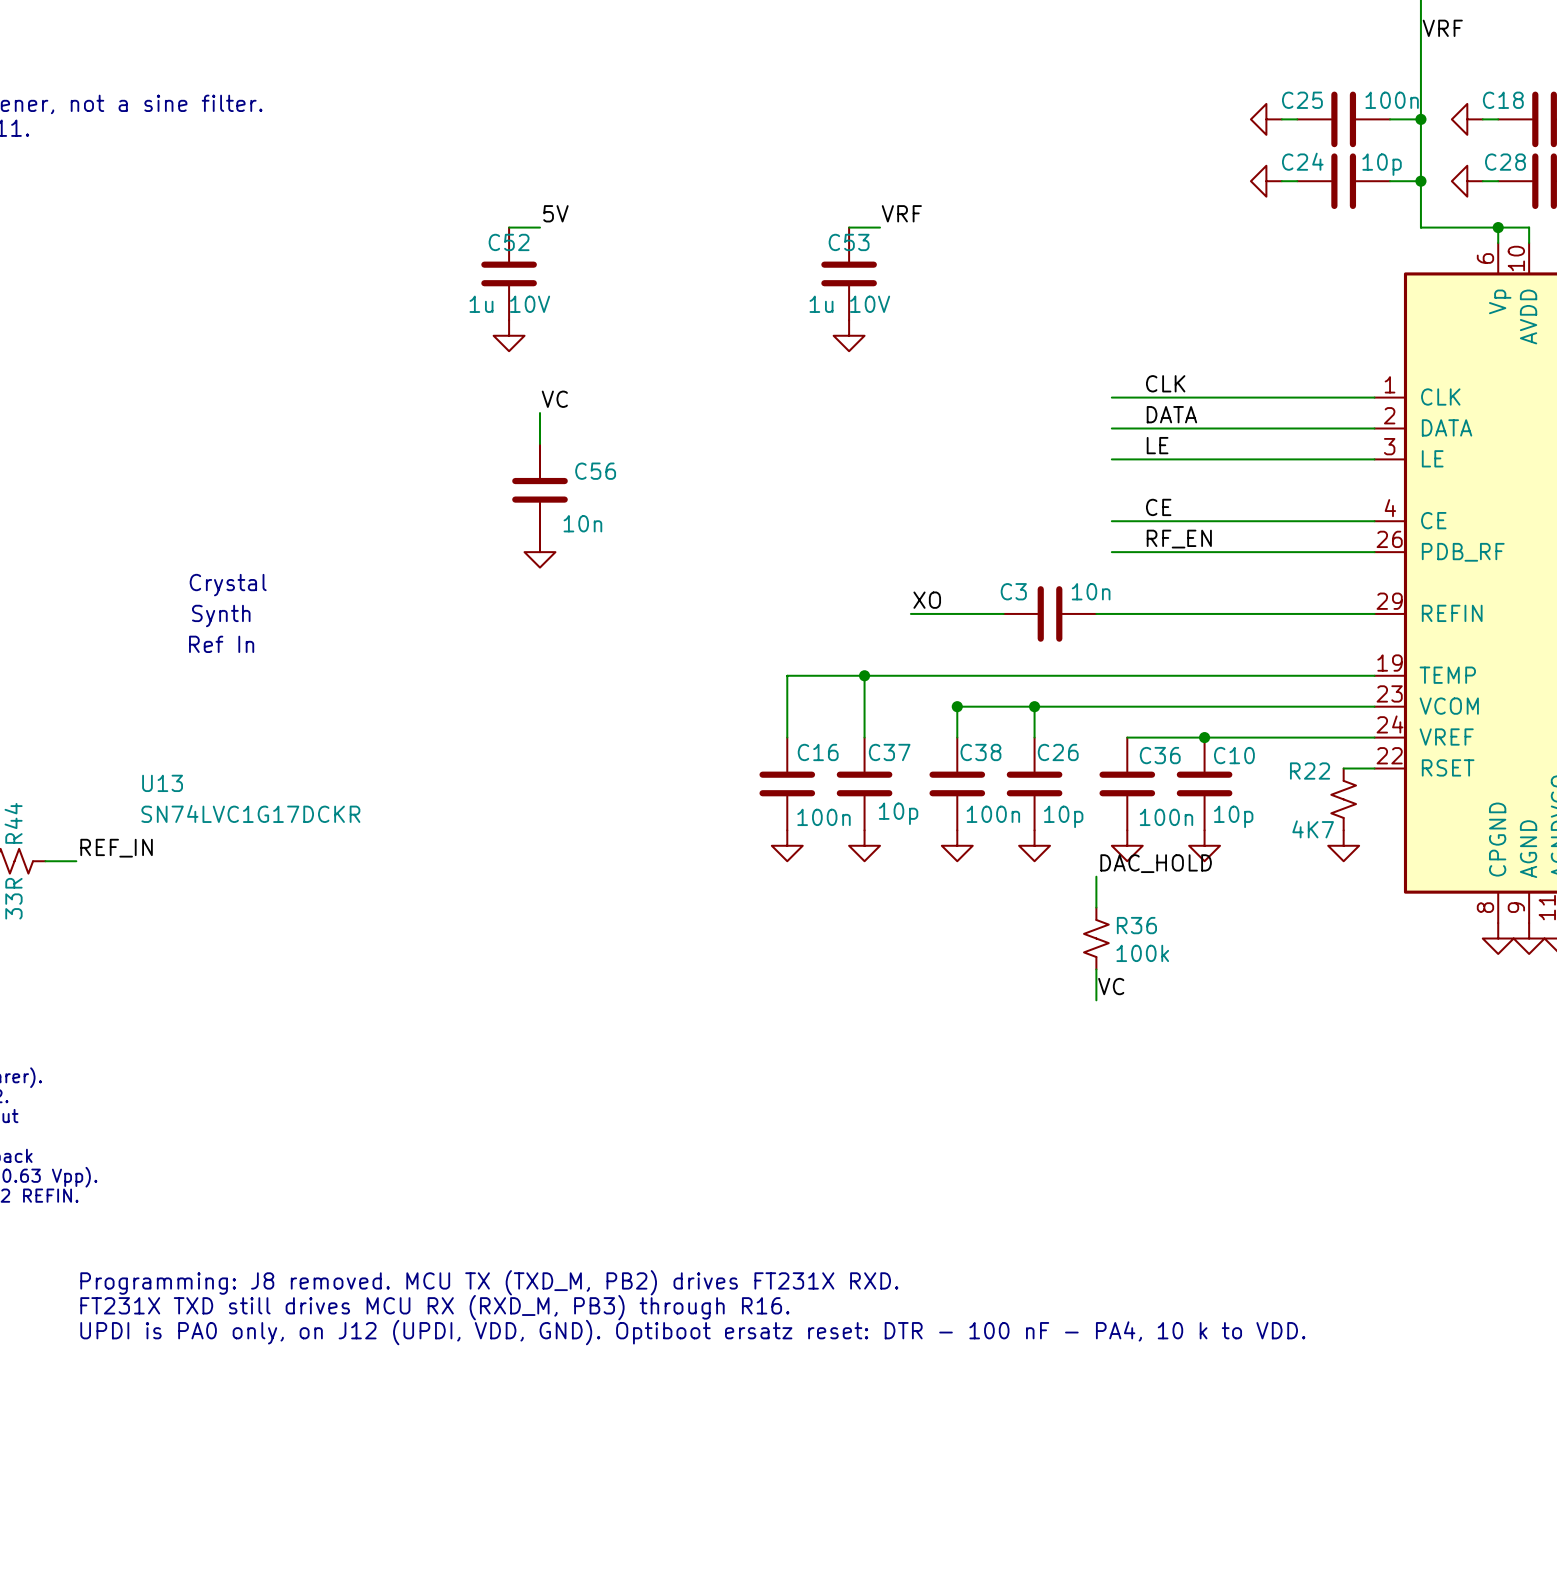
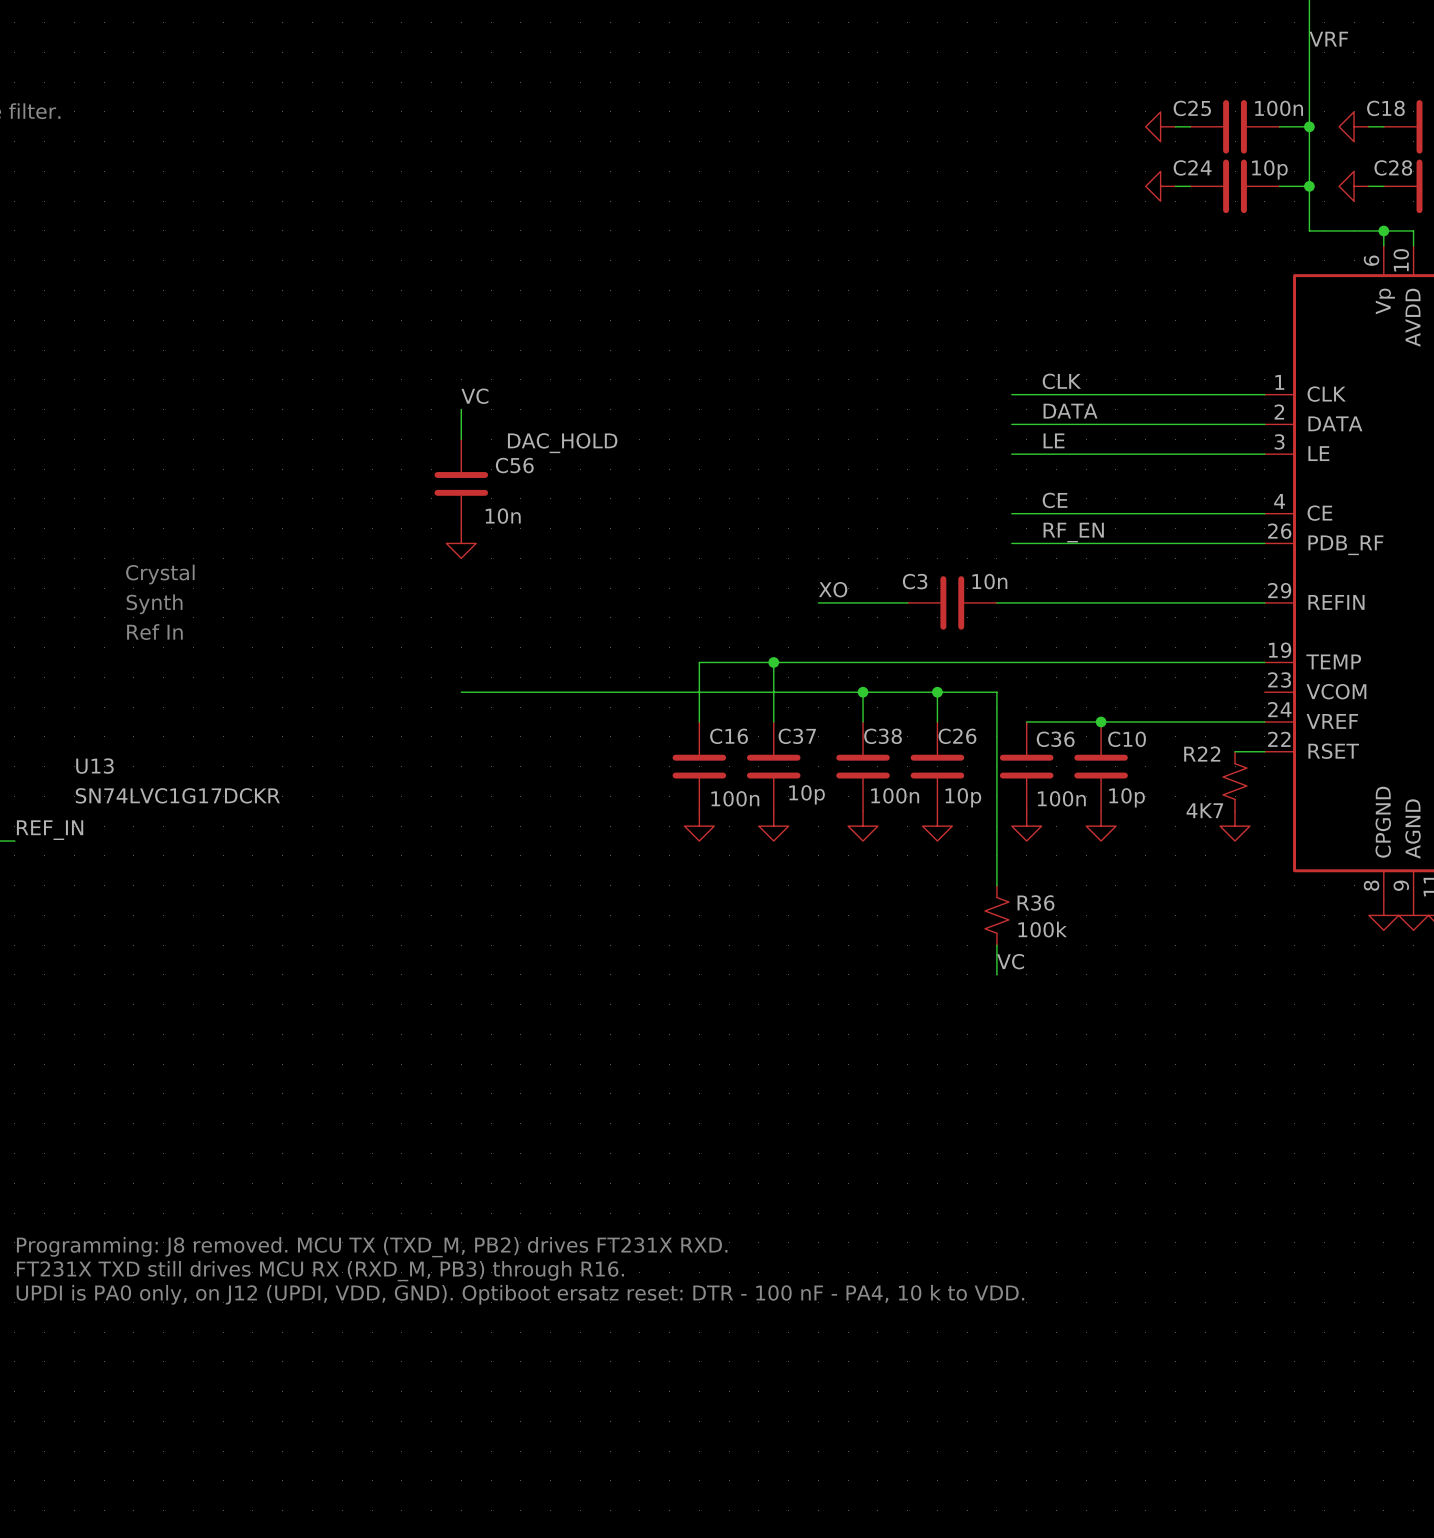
label: 5V (555, 213) -> none
label: VRF (901, 213) -> none
wire: (509, 227) (539, 227) -> none
wire: (849, 227) (880, 227) -> none
C52: 1u 10V (509, 273) -> none
C53: 1u 10V (849, 273) -> none
power symbol: (509, 335) -> none
power symbol: (849, 335) -> none
label: none -> DAC_HOLD (562, 443)
wire: none -> (461, 692) (863, 692)
wire: (1096, 706) (1374, 706) -> (996, 692) (996, 855)
label: DAC_HOLD (1156, 863) -> none

